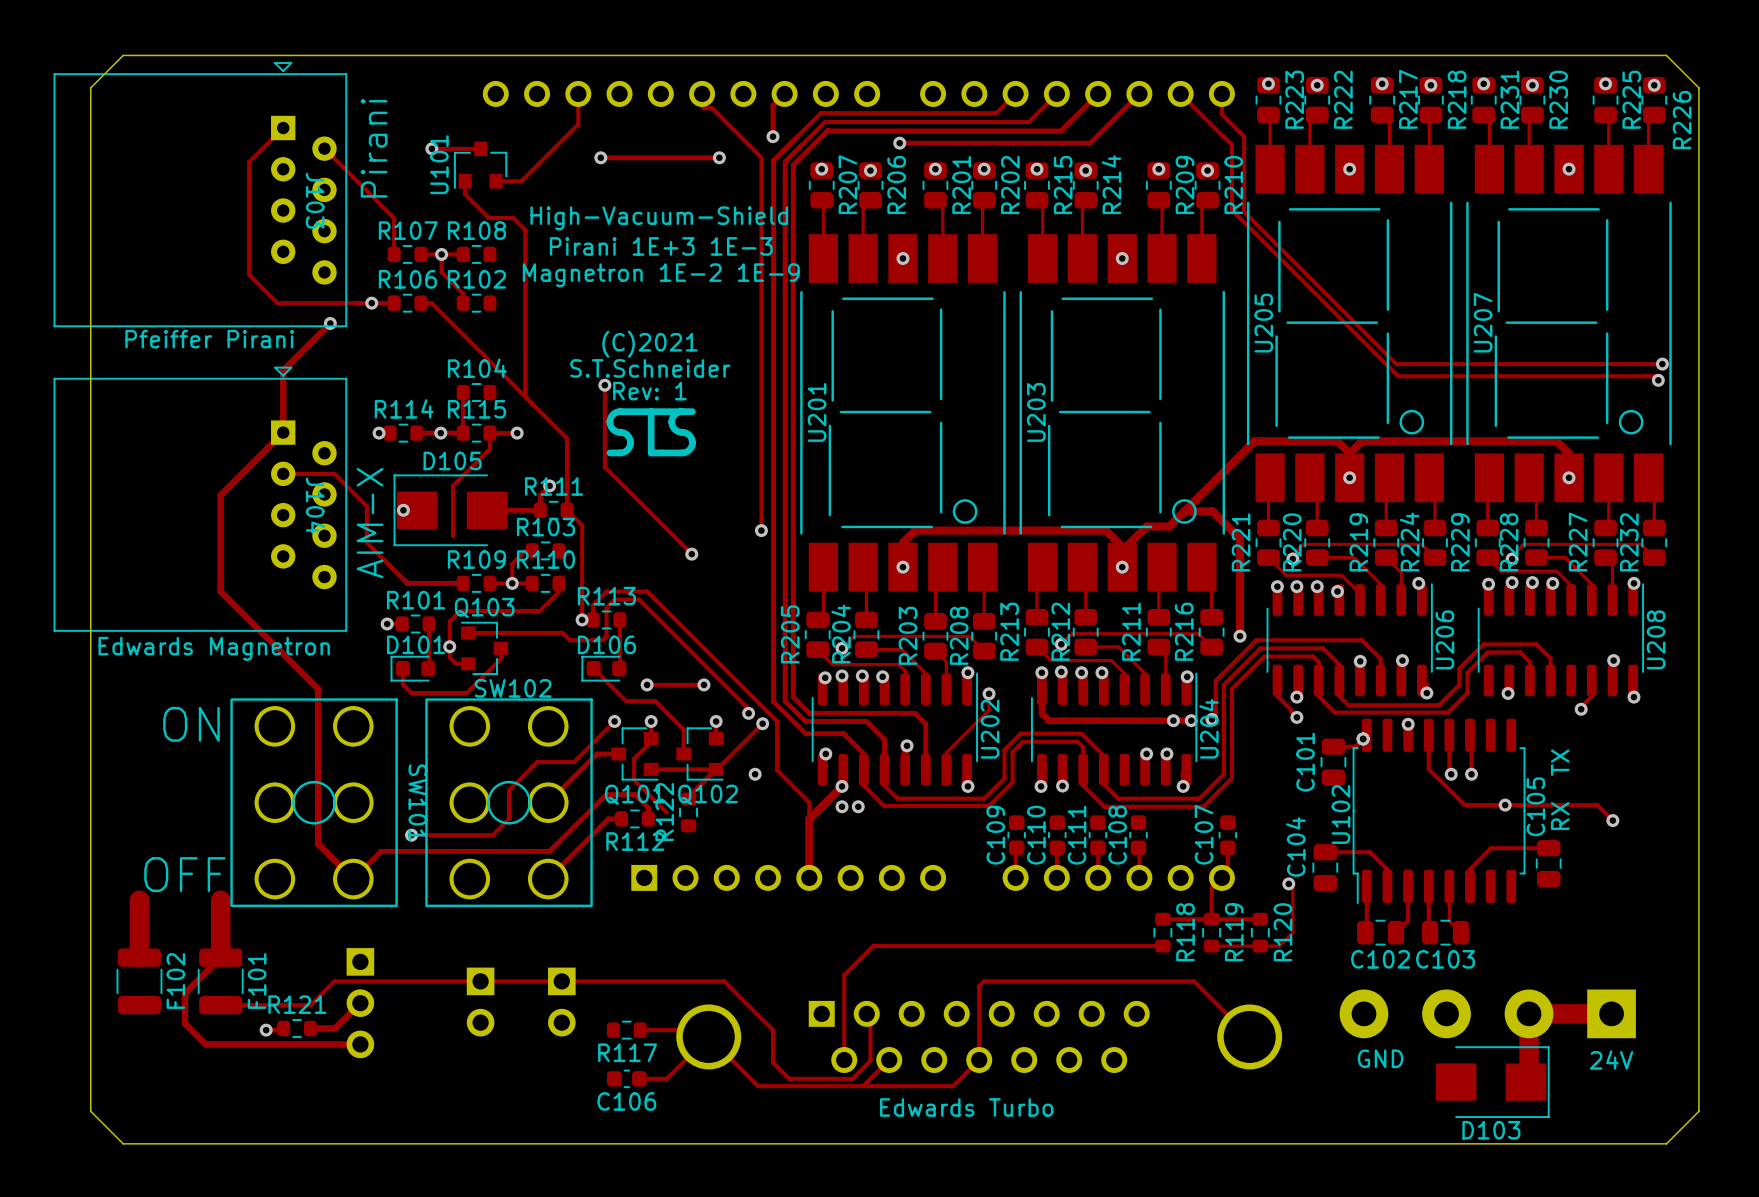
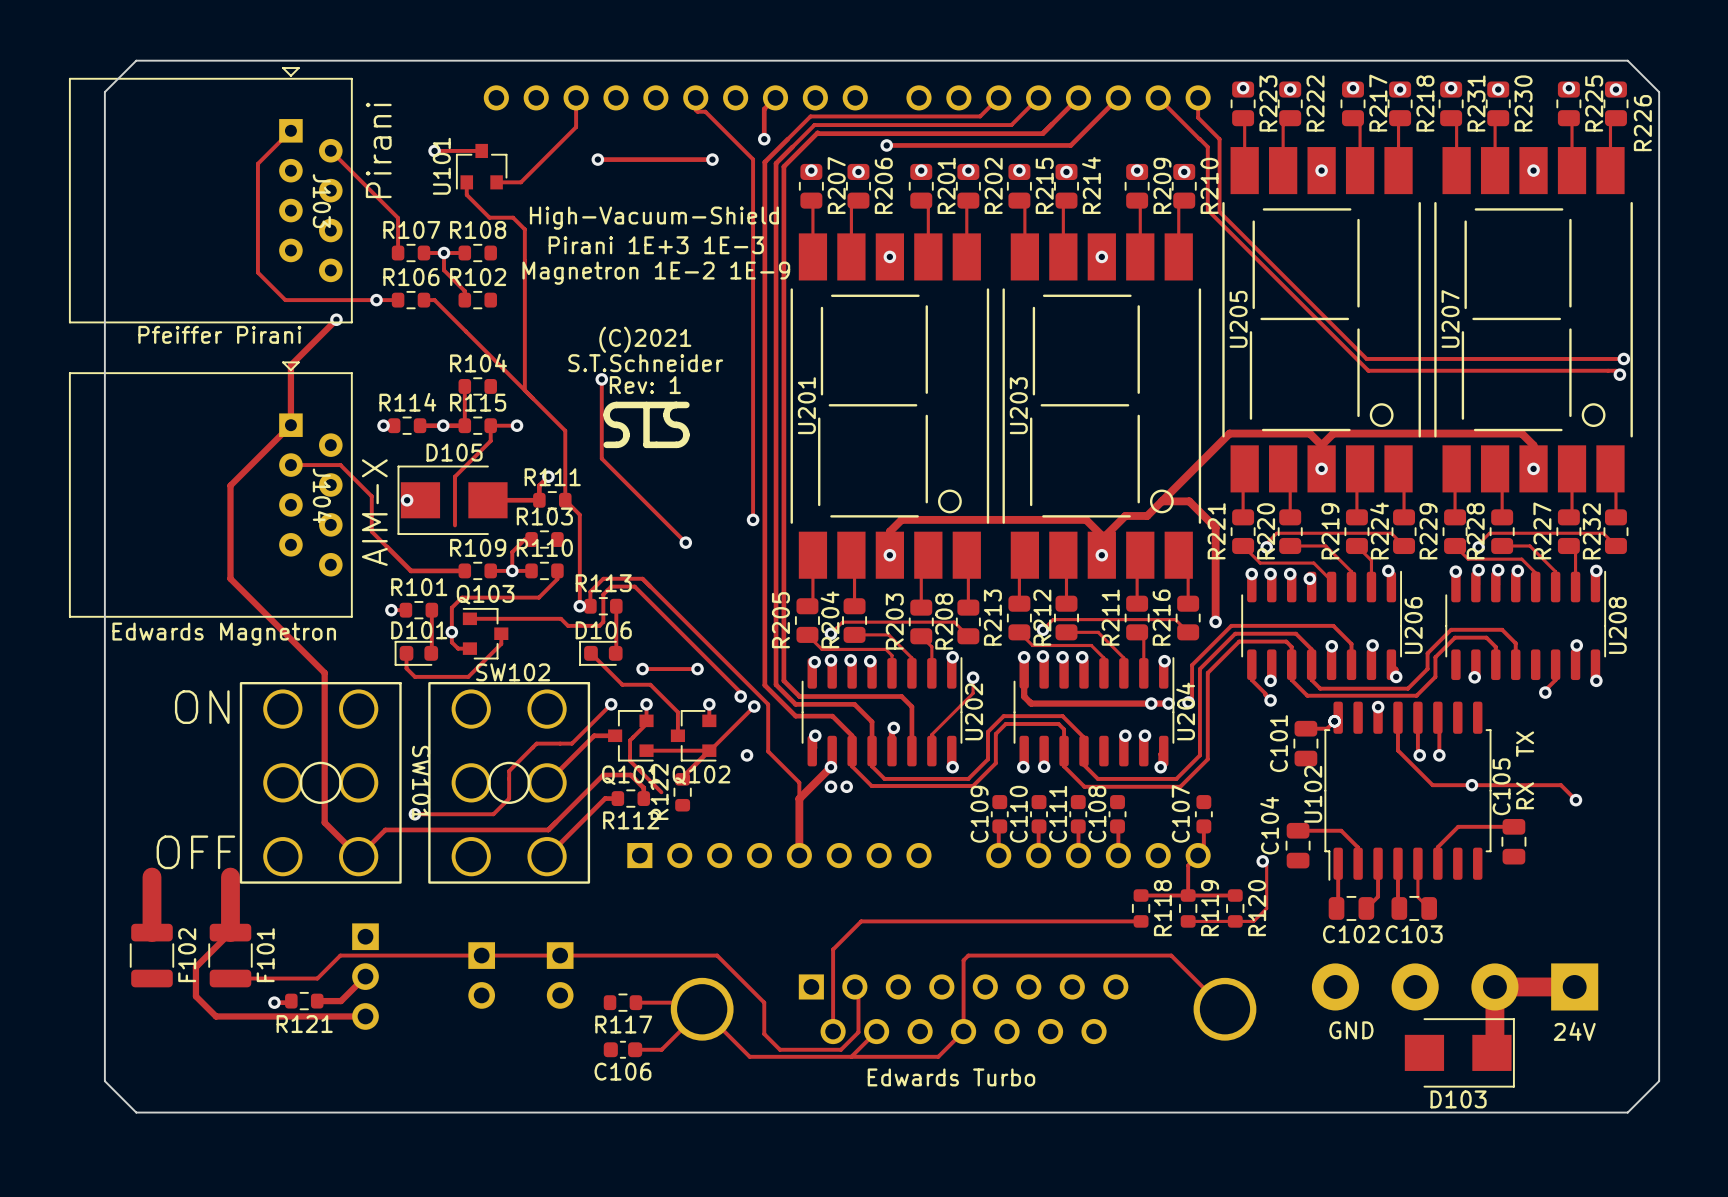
R121 name position: R121 (297, 1004) -> R121 (304, 1024)

